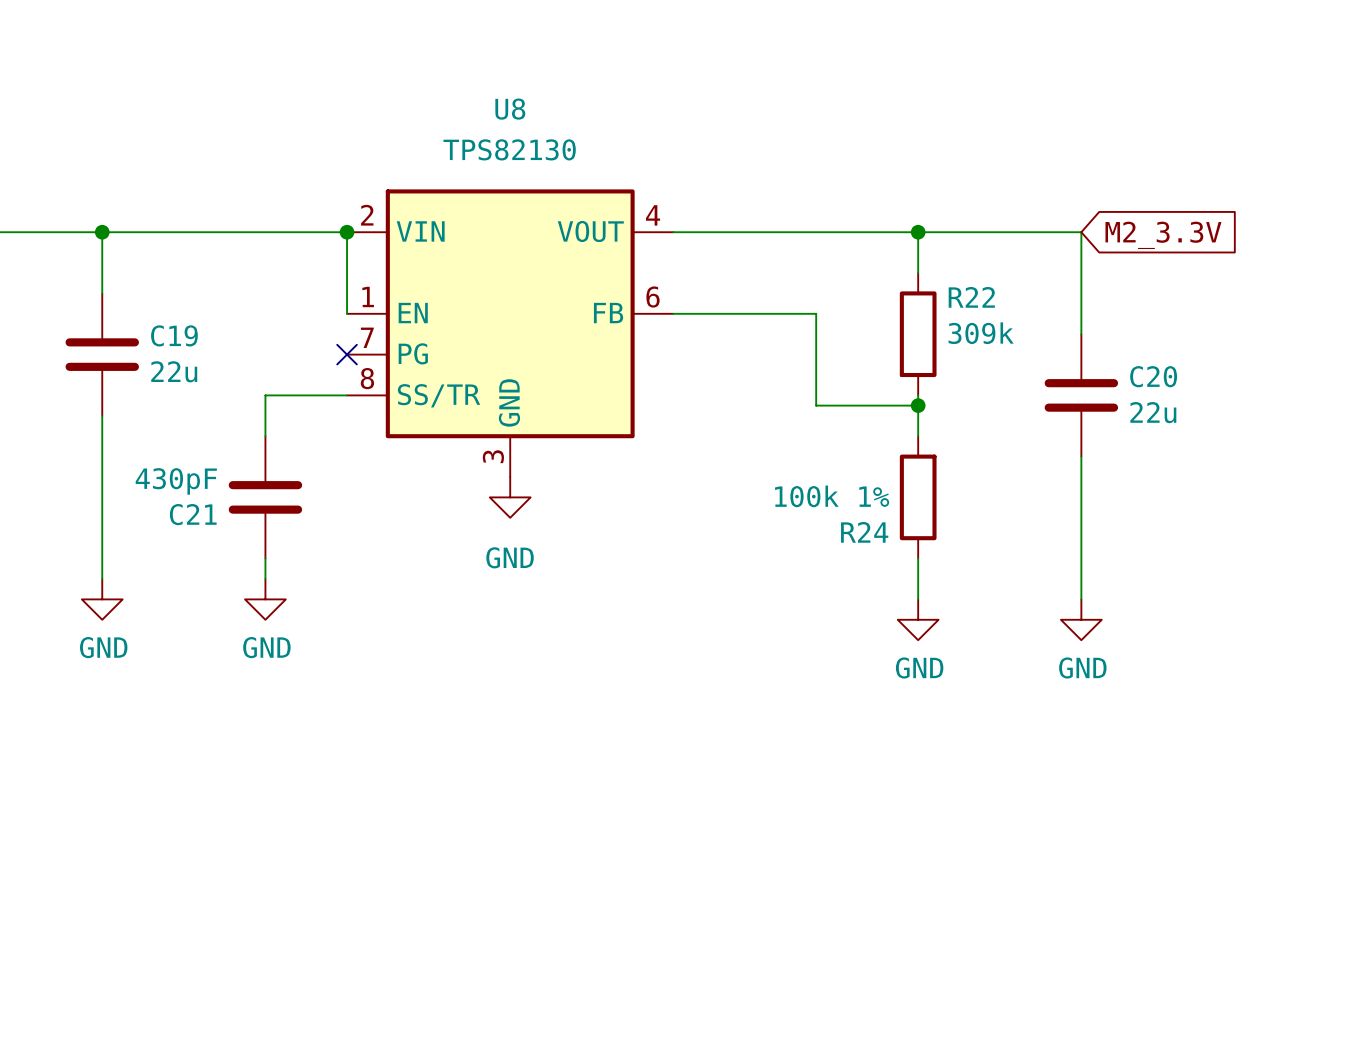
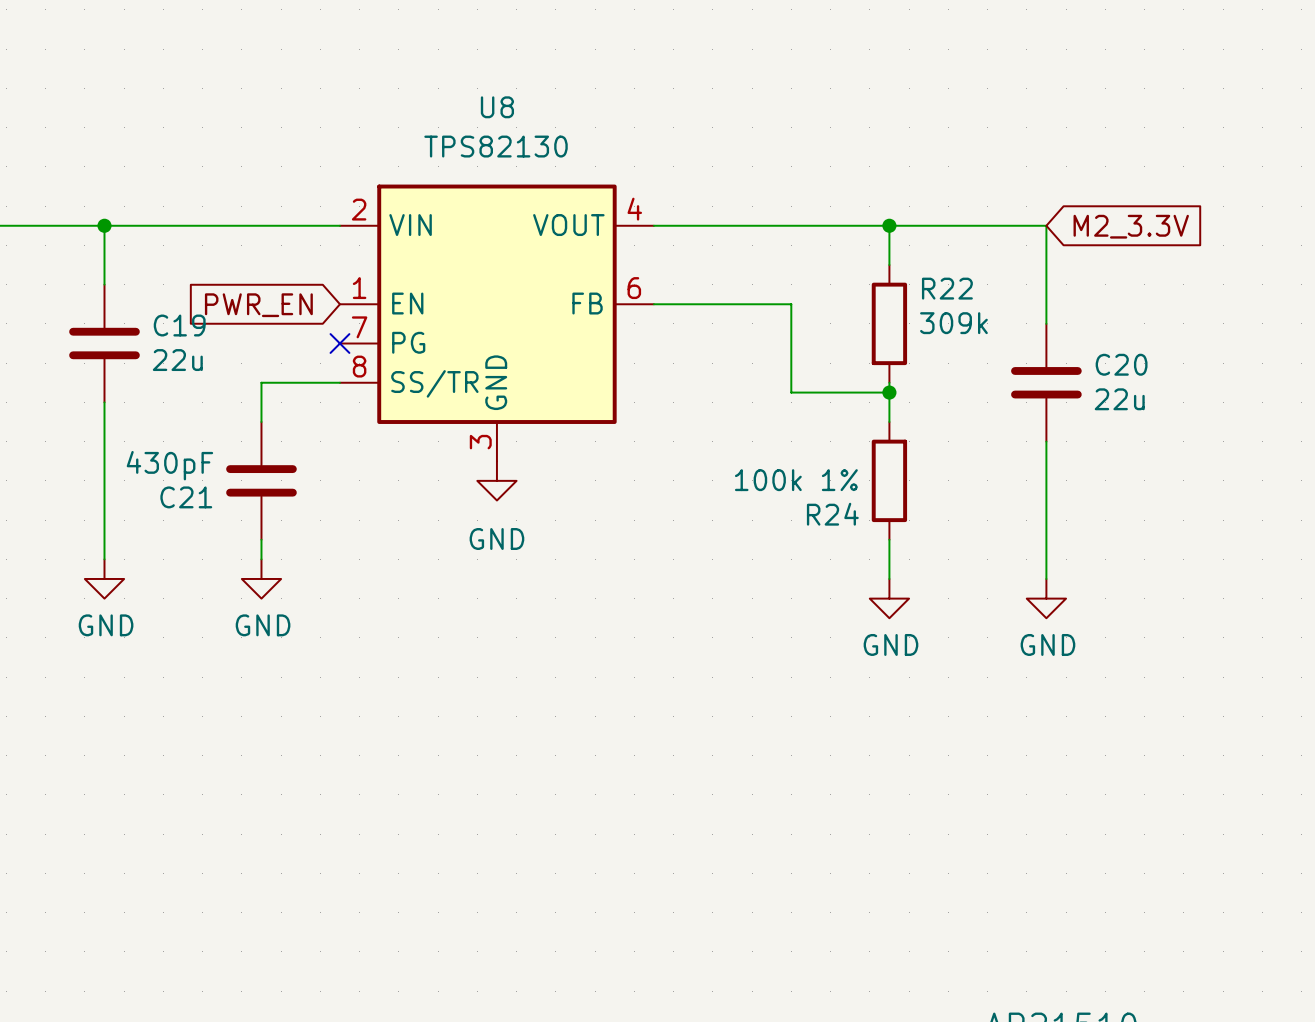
wire: (347, 232) (347, 313) -> none
junction: (347, 232) -> none
global label: none -> PWR_EN (258, 305)

